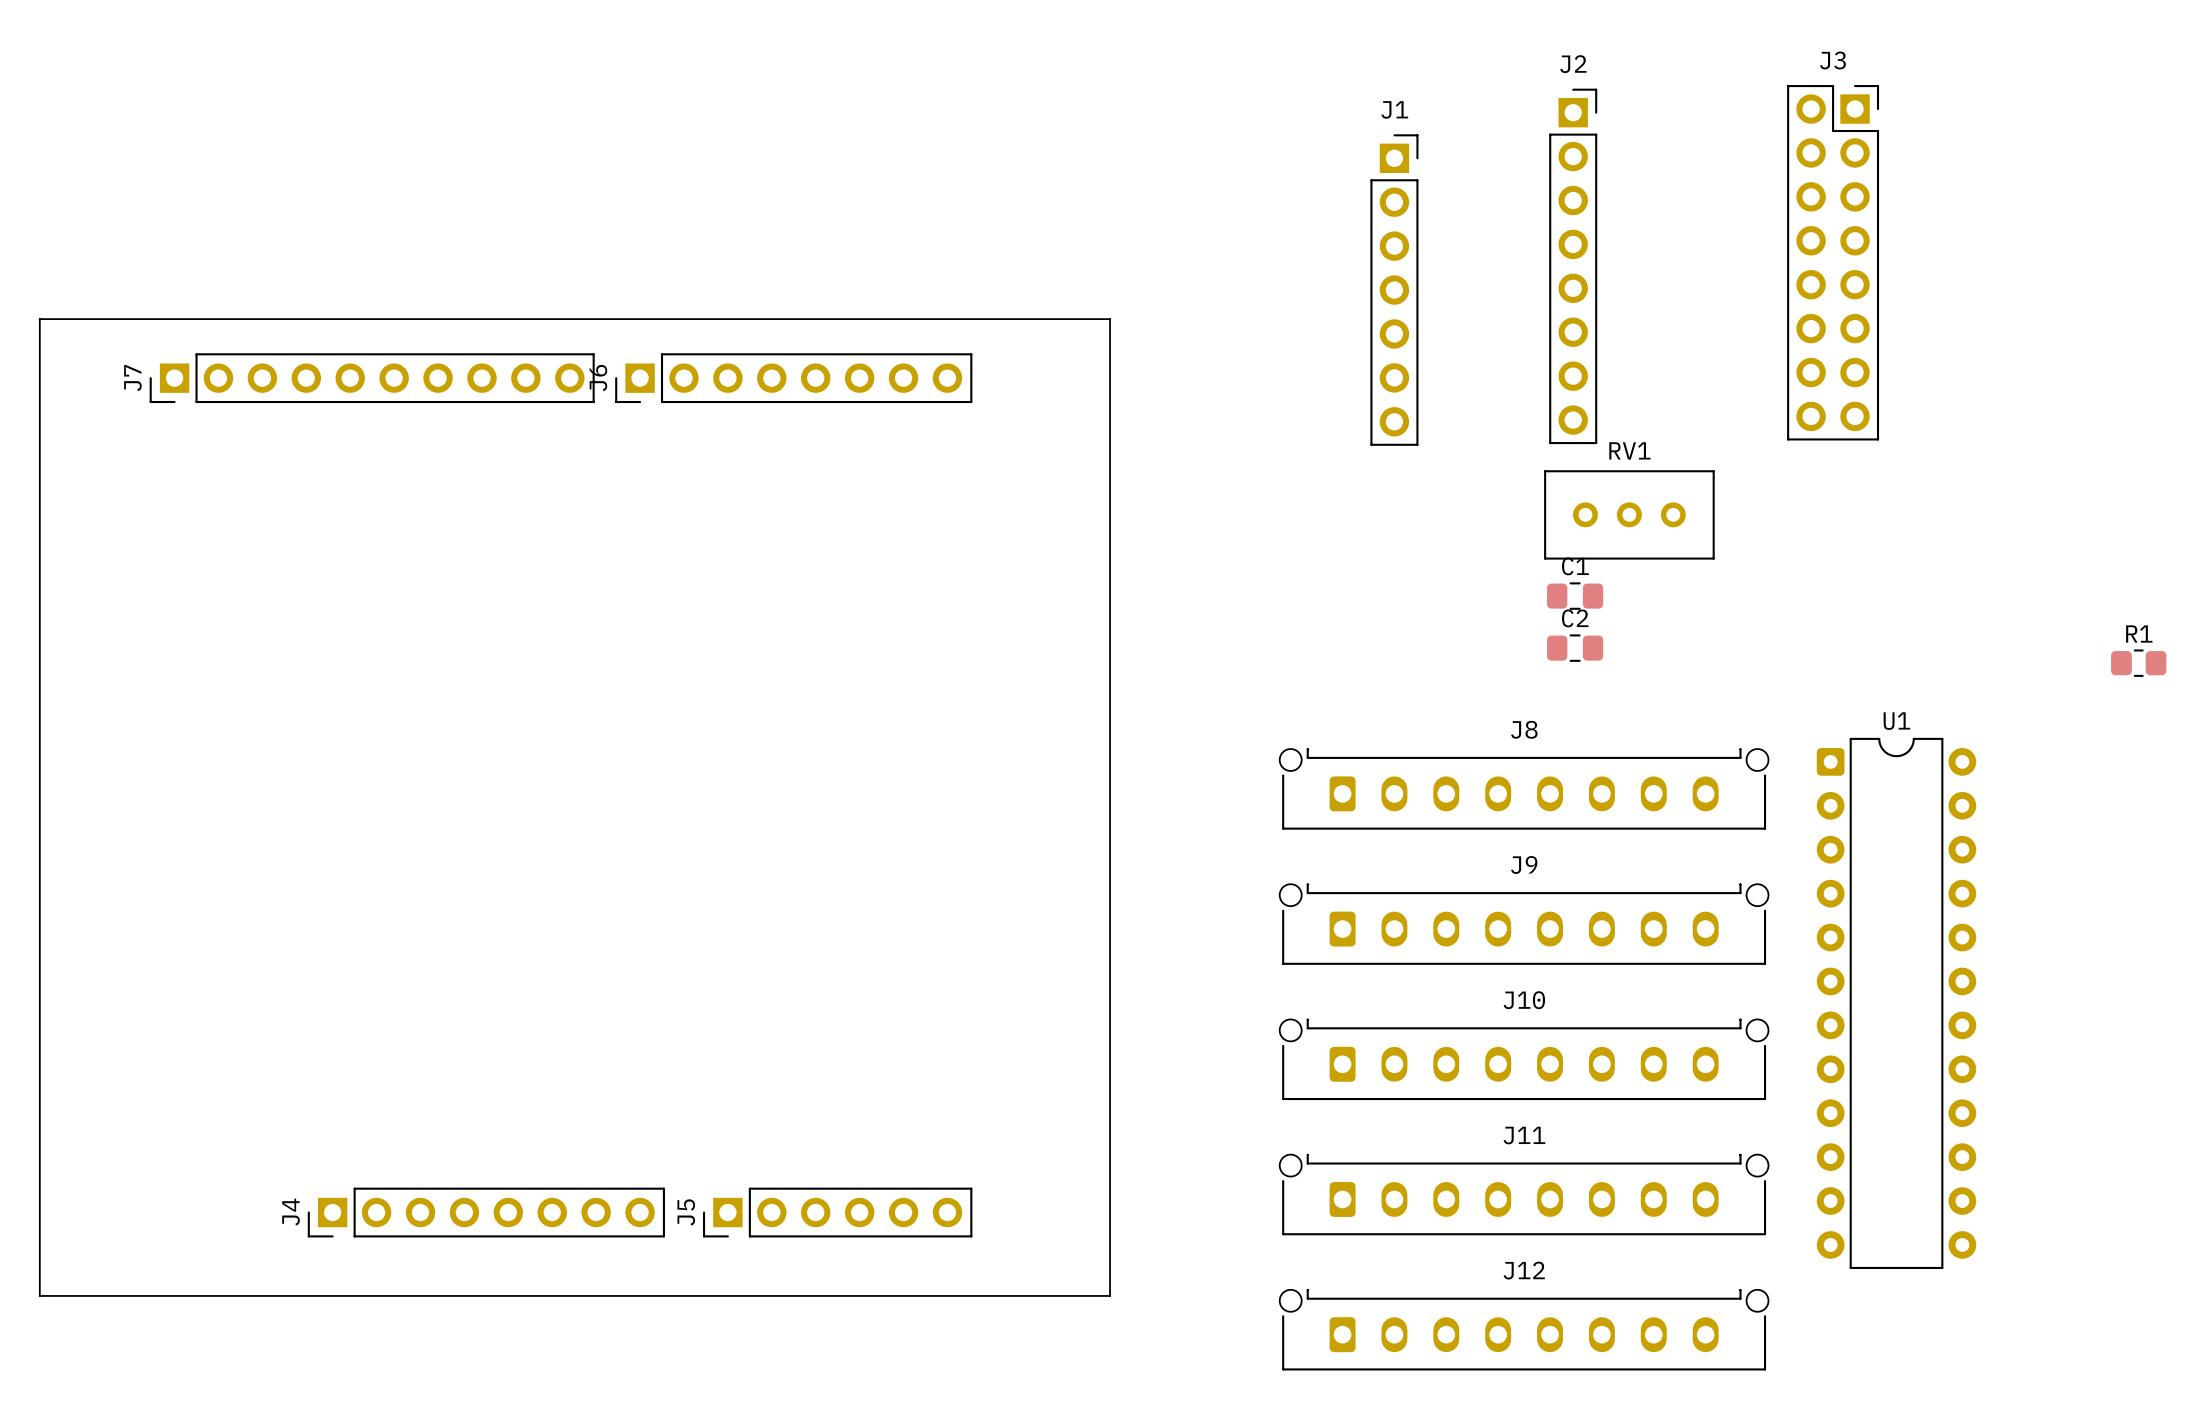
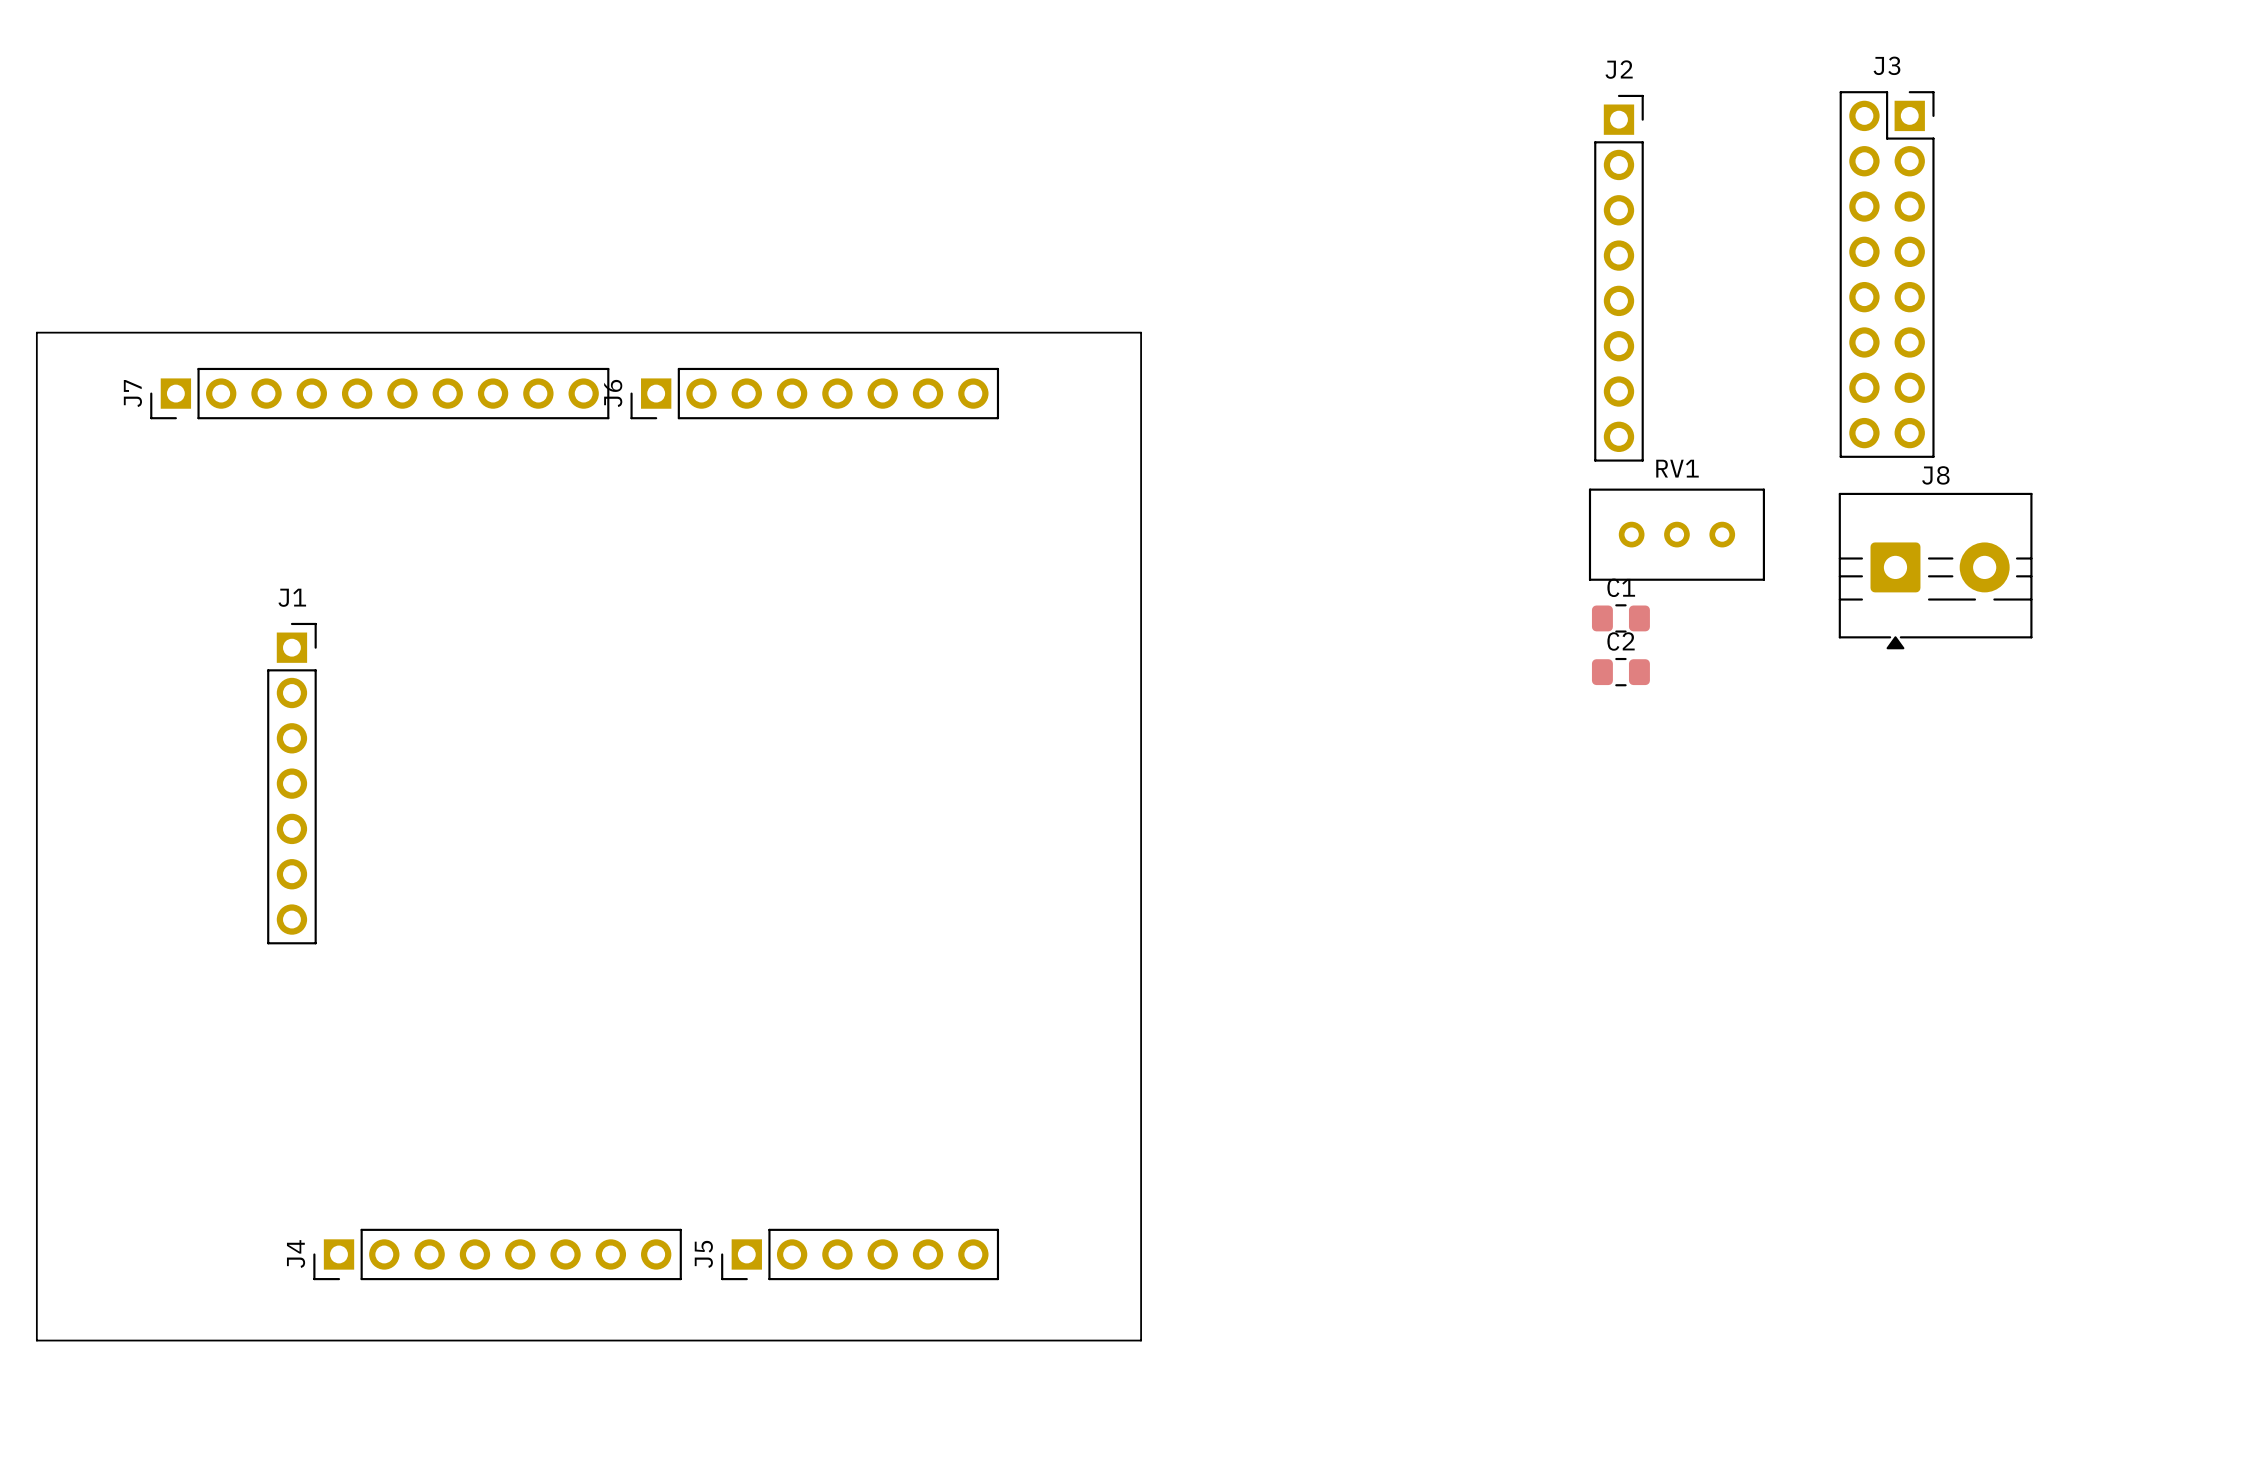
J1 position: (1394, 290) -> (291, 783)
R1: (2138, 663) -> none
J8 footprint: [1279, 748, 1769, 830] -> [1838, 492, 2033, 650]
J9: (1524, 924) -> none
U1: (1896, 1003) -> none
J10: (1524, 1059) -> none
J11: (1524, 1194) -> none
J12: (1524, 1329) -> none

